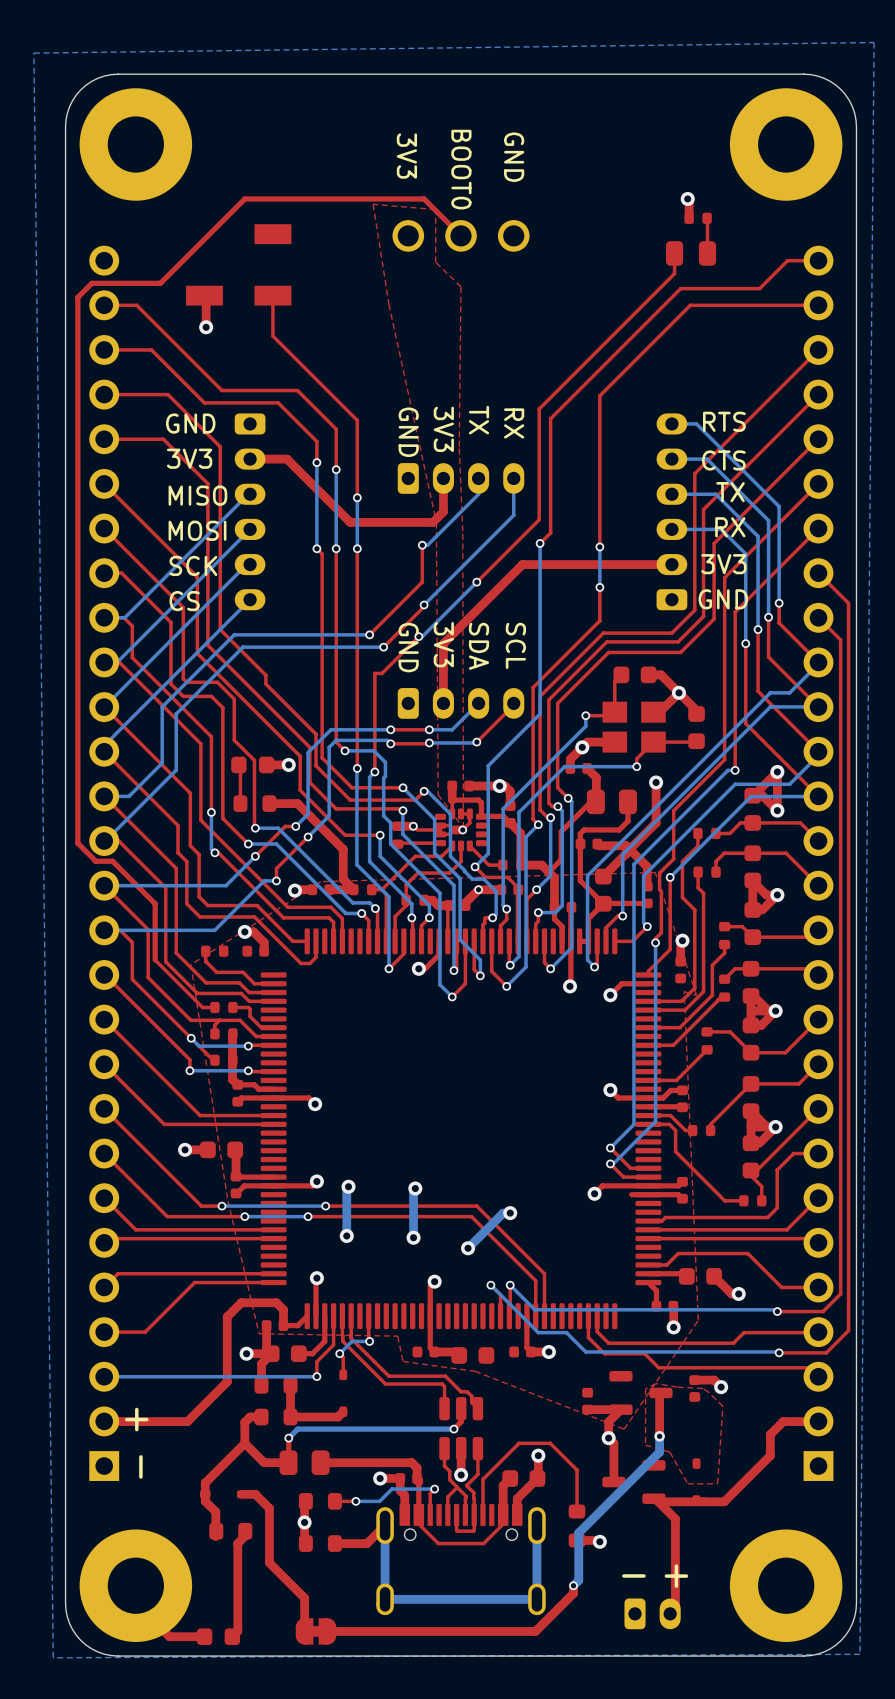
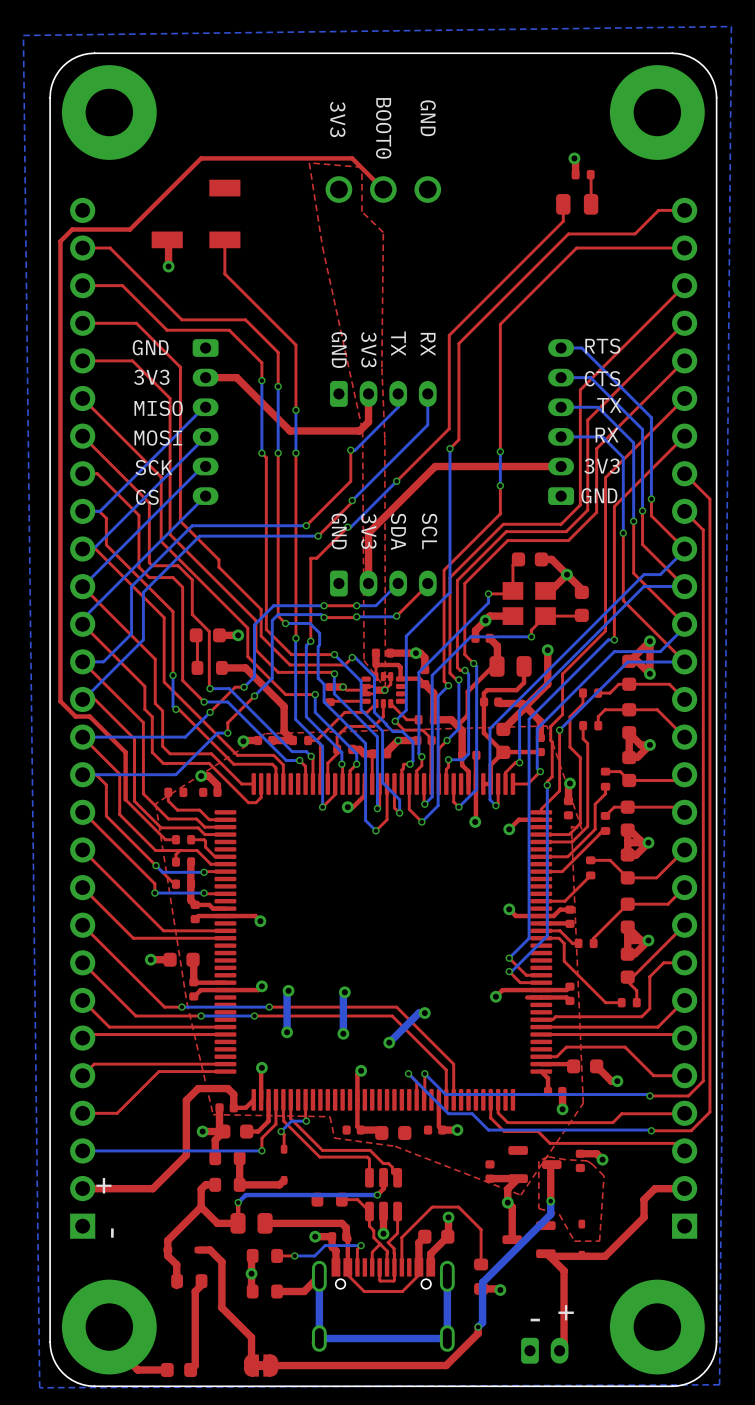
part: none -> (329, 1199)
top track: none -> (341, 1199) (357, 1199) (369, 1211)

